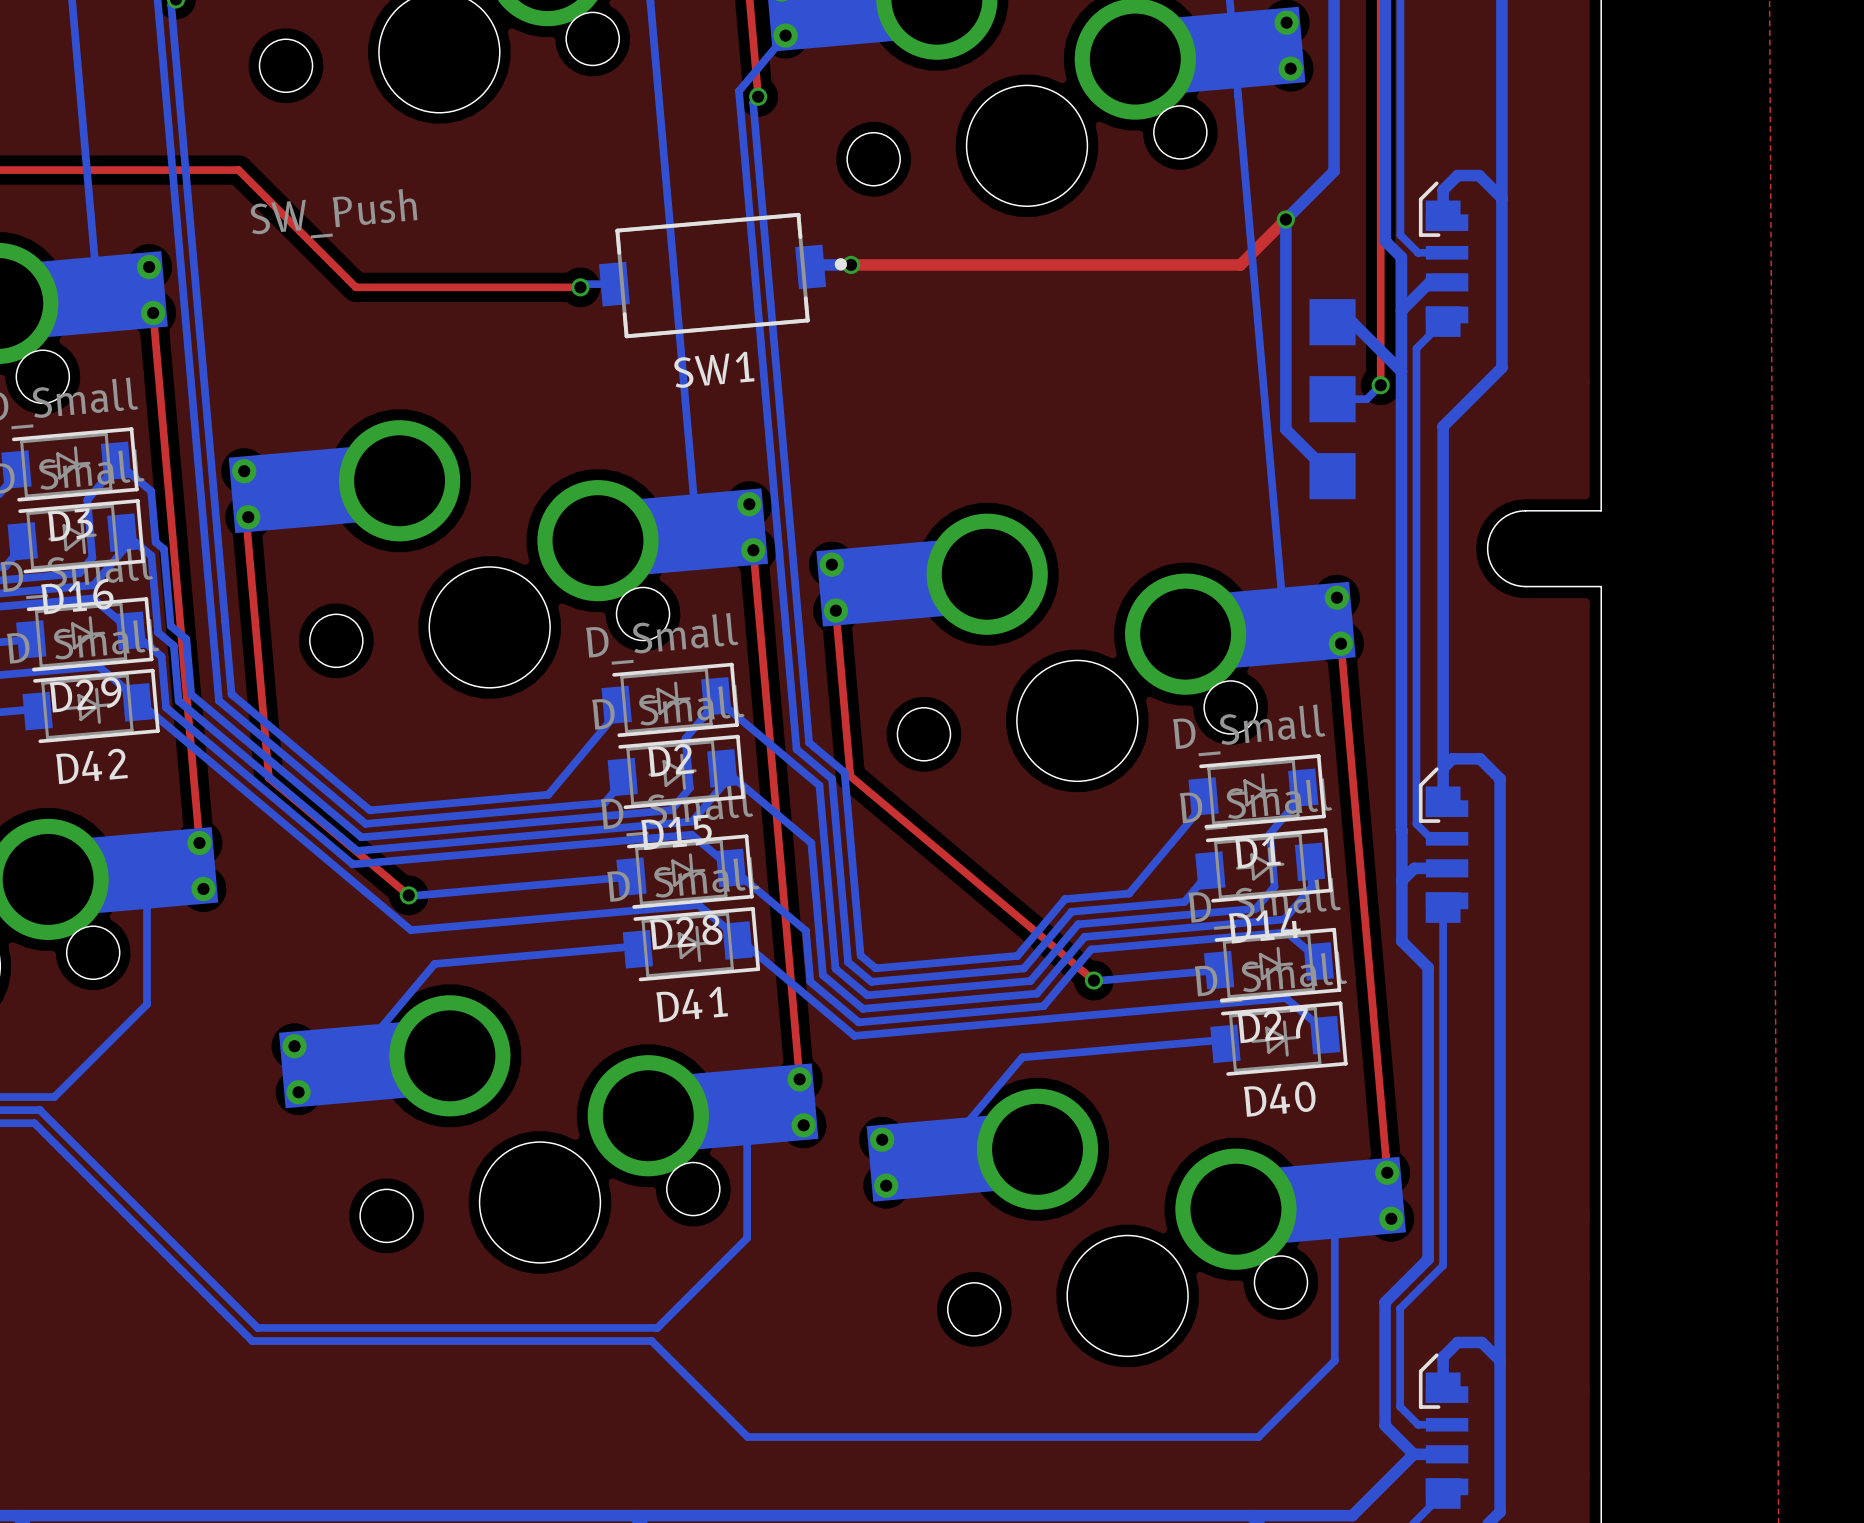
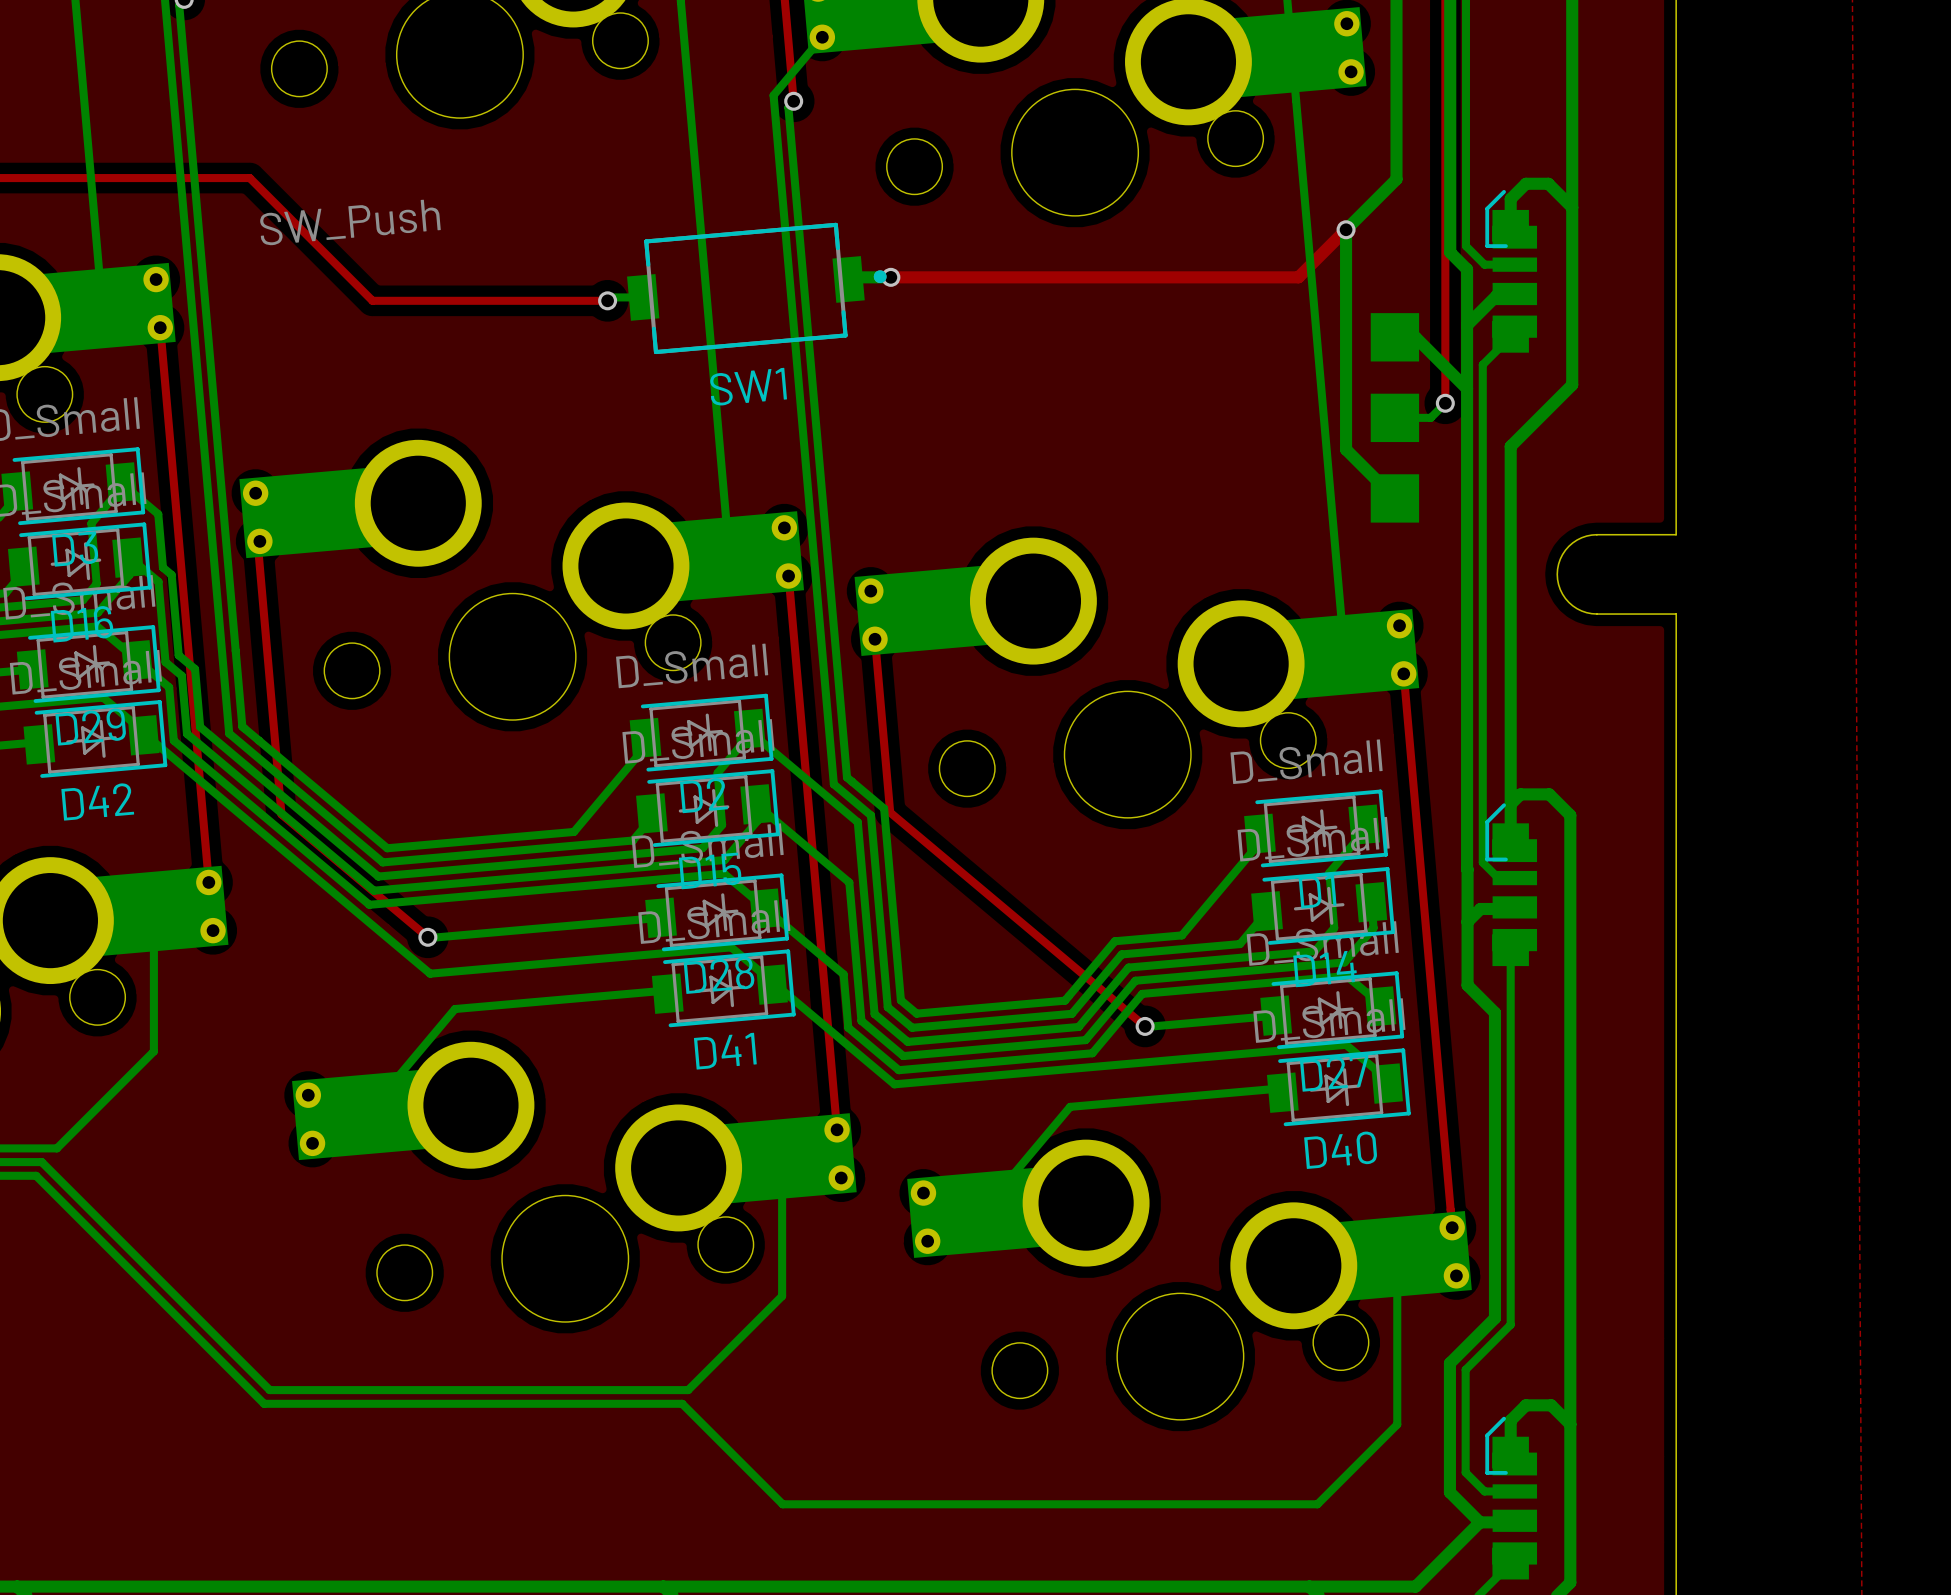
part footprint: [1418, 181, 1469, 337] -> [1485, 189, 1538, 353]
part footprint: [1418, 767, 1469, 923] -> [1485, 803, 1538, 967]
part footprint: [1418, 1353, 1469, 1509] -> [1485, 1416, 1538, 1580]

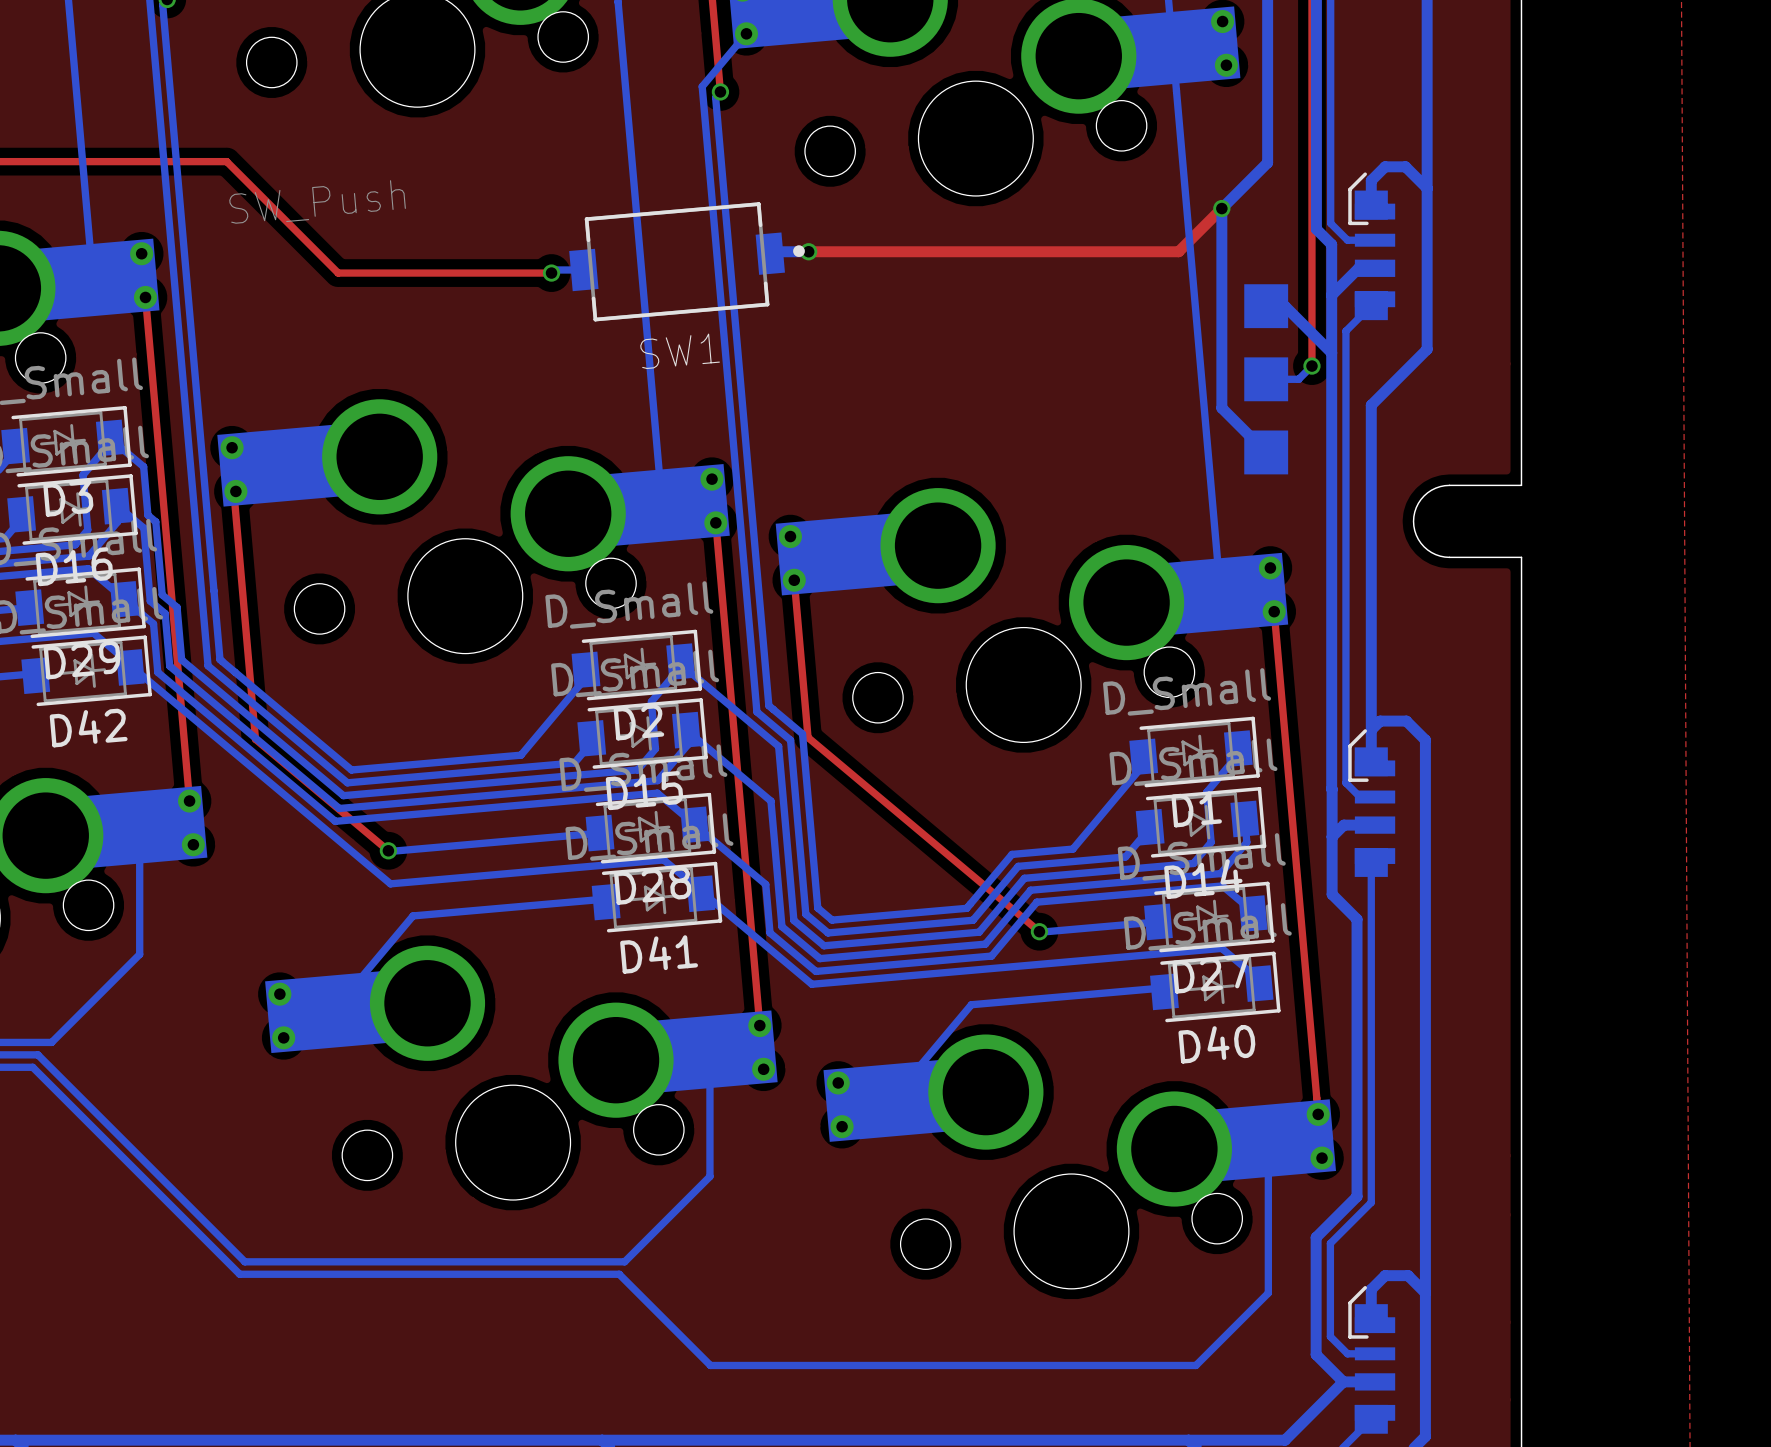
part footprint: [1485, 189, 1538, 353] -> [1348, 172, 1396, 321]
part footprint: [1485, 803, 1538, 967] -> [1348, 729, 1396, 877]
part footprint: [1485, 1416, 1538, 1580] -> [1348, 1286, 1396, 1434]

